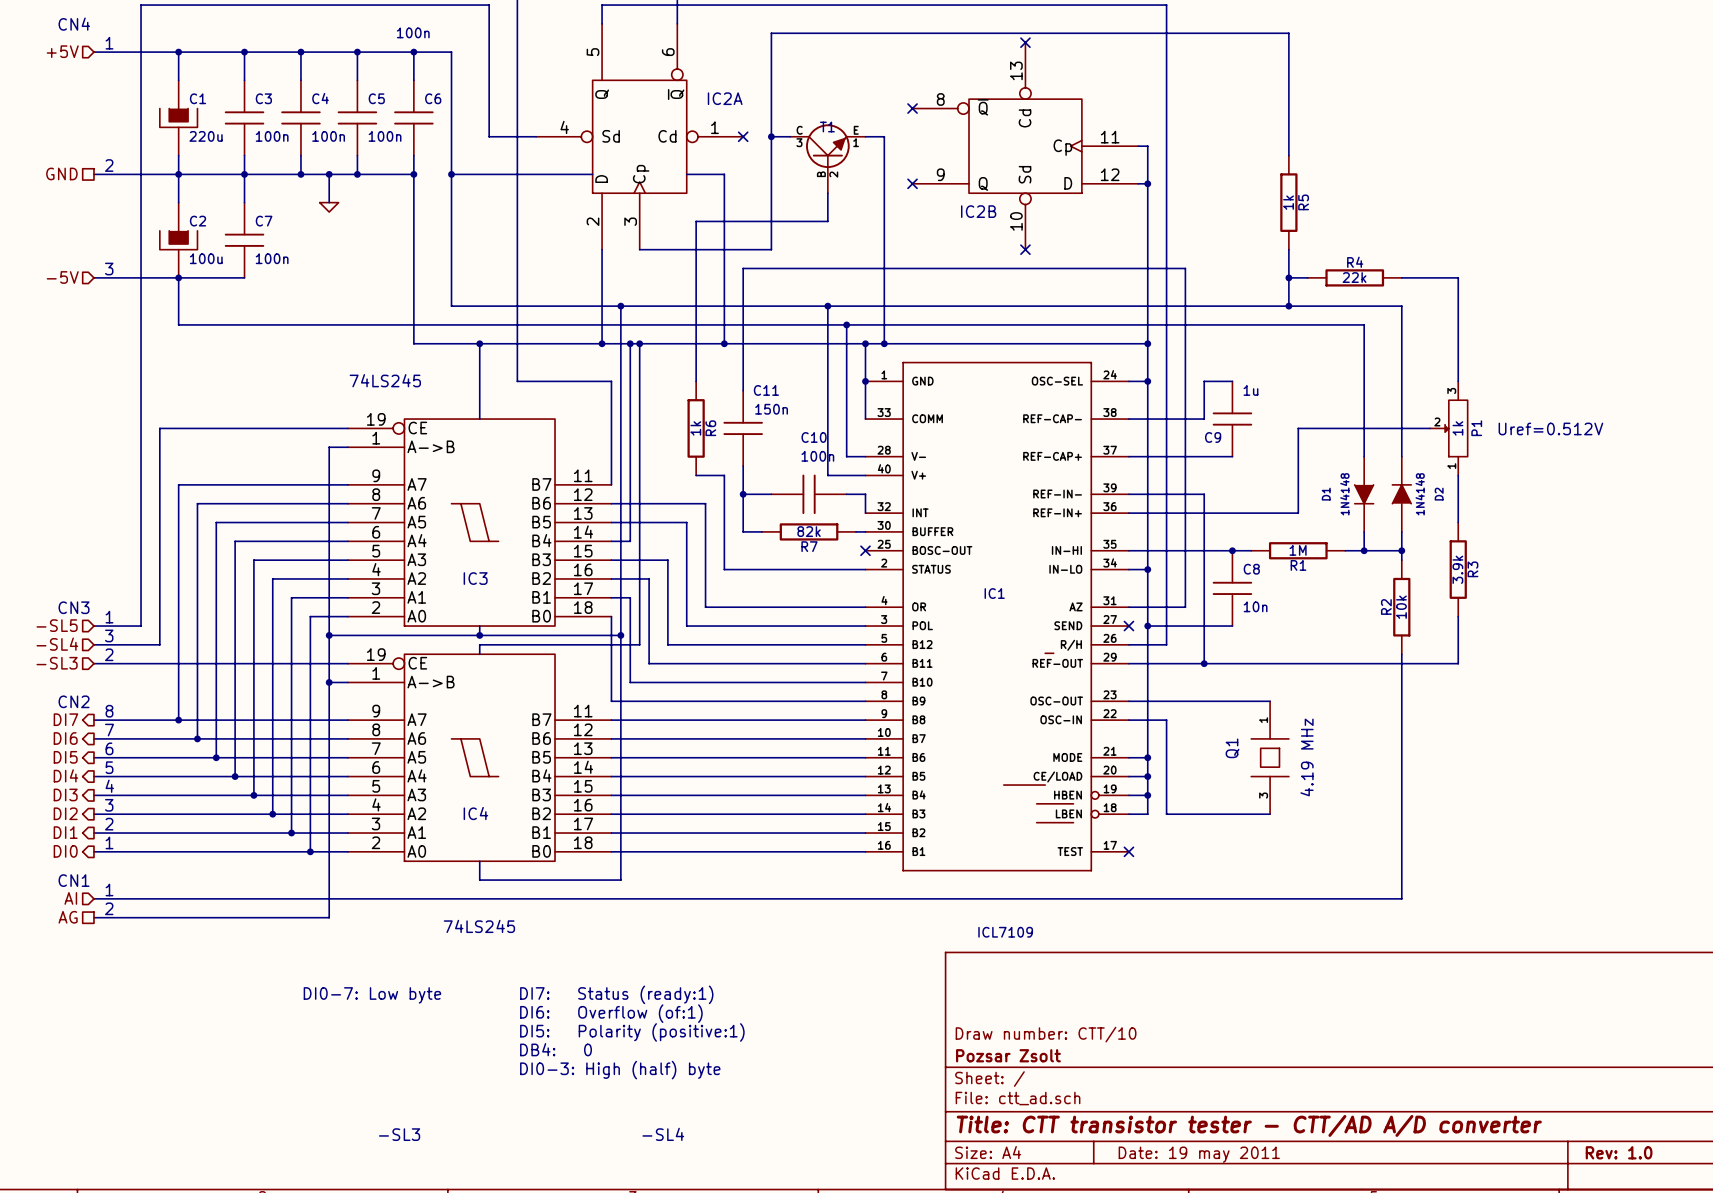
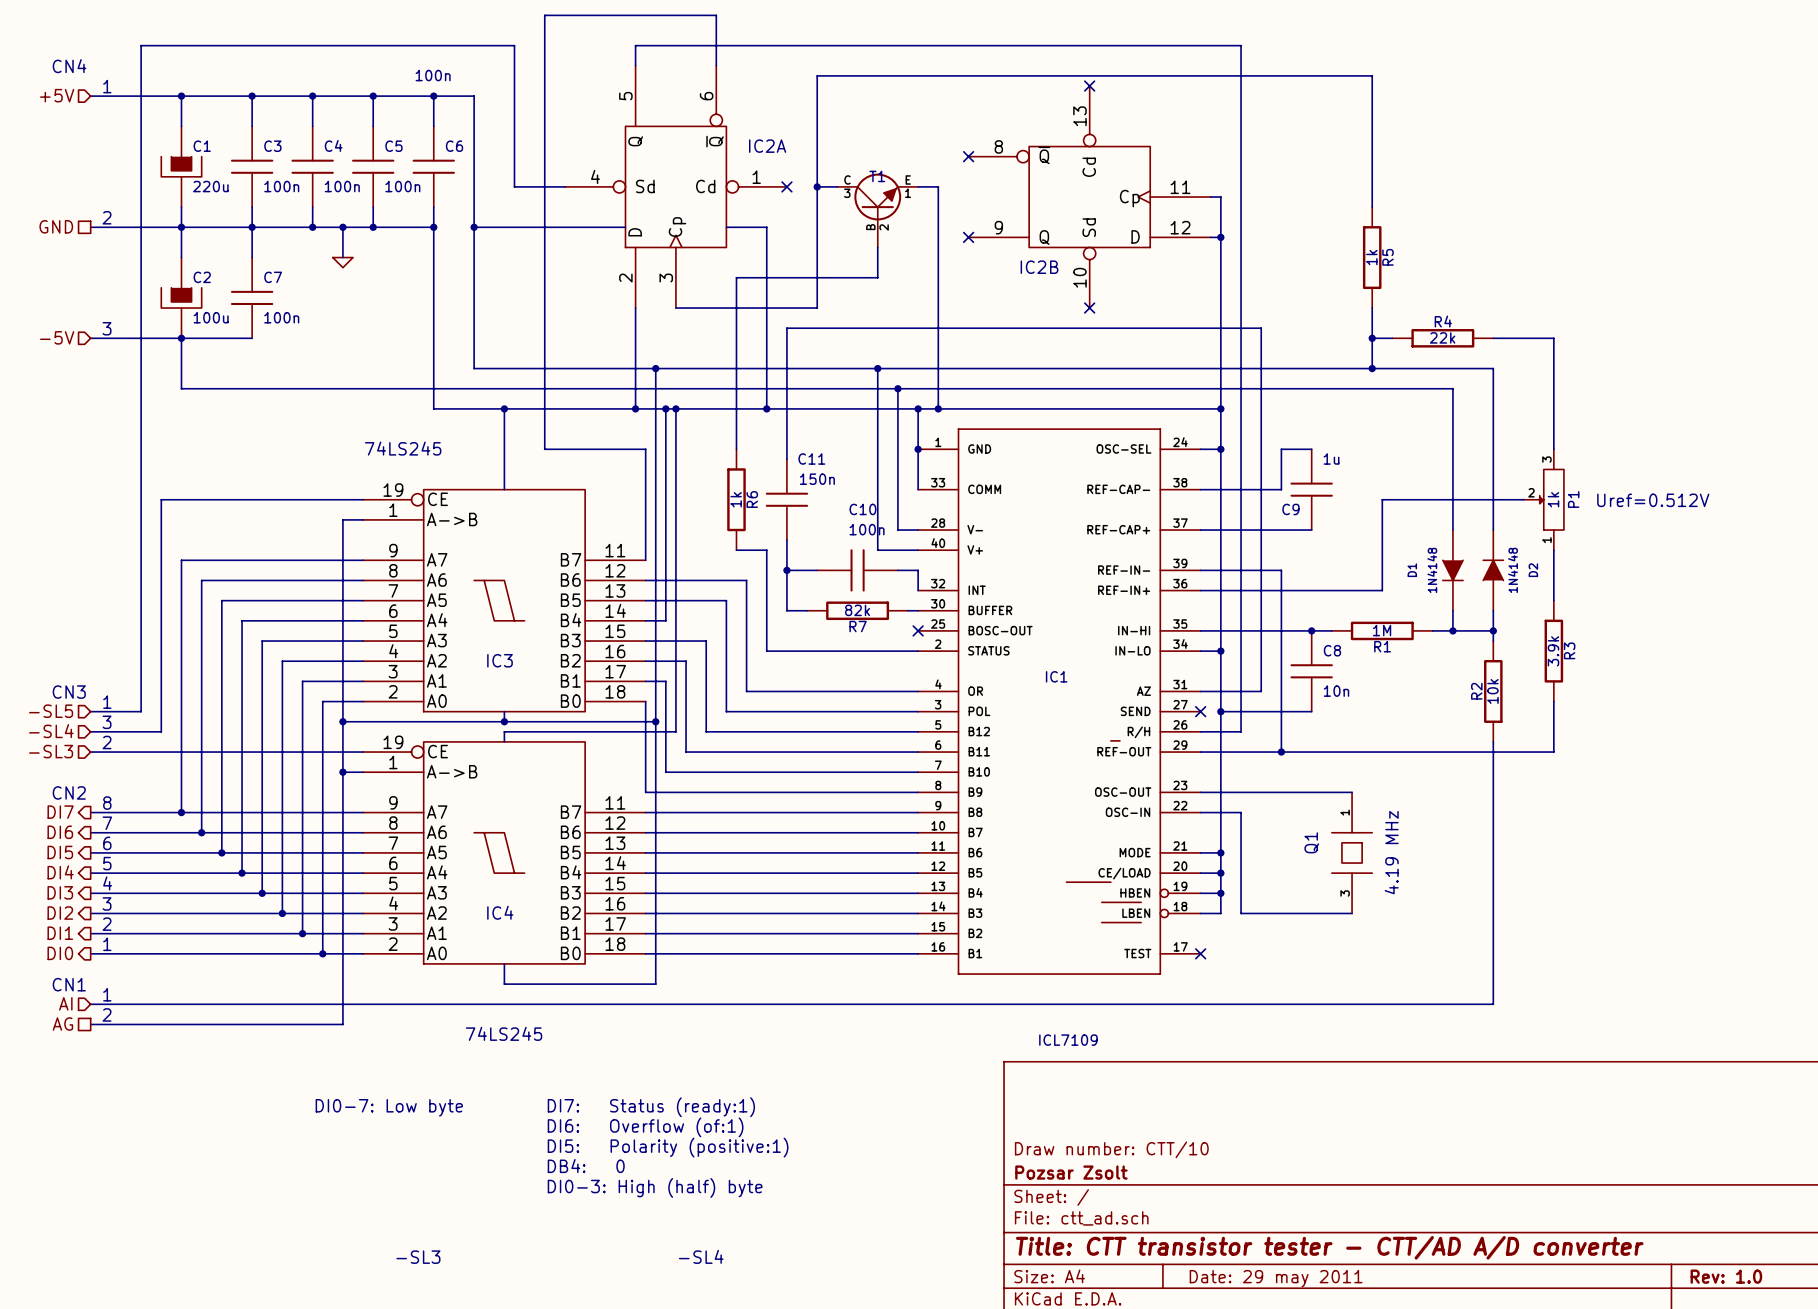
title block: Date: 19 may 2011 (1199, 1154) -> Date: 29 may 2011 (1276, 1278)

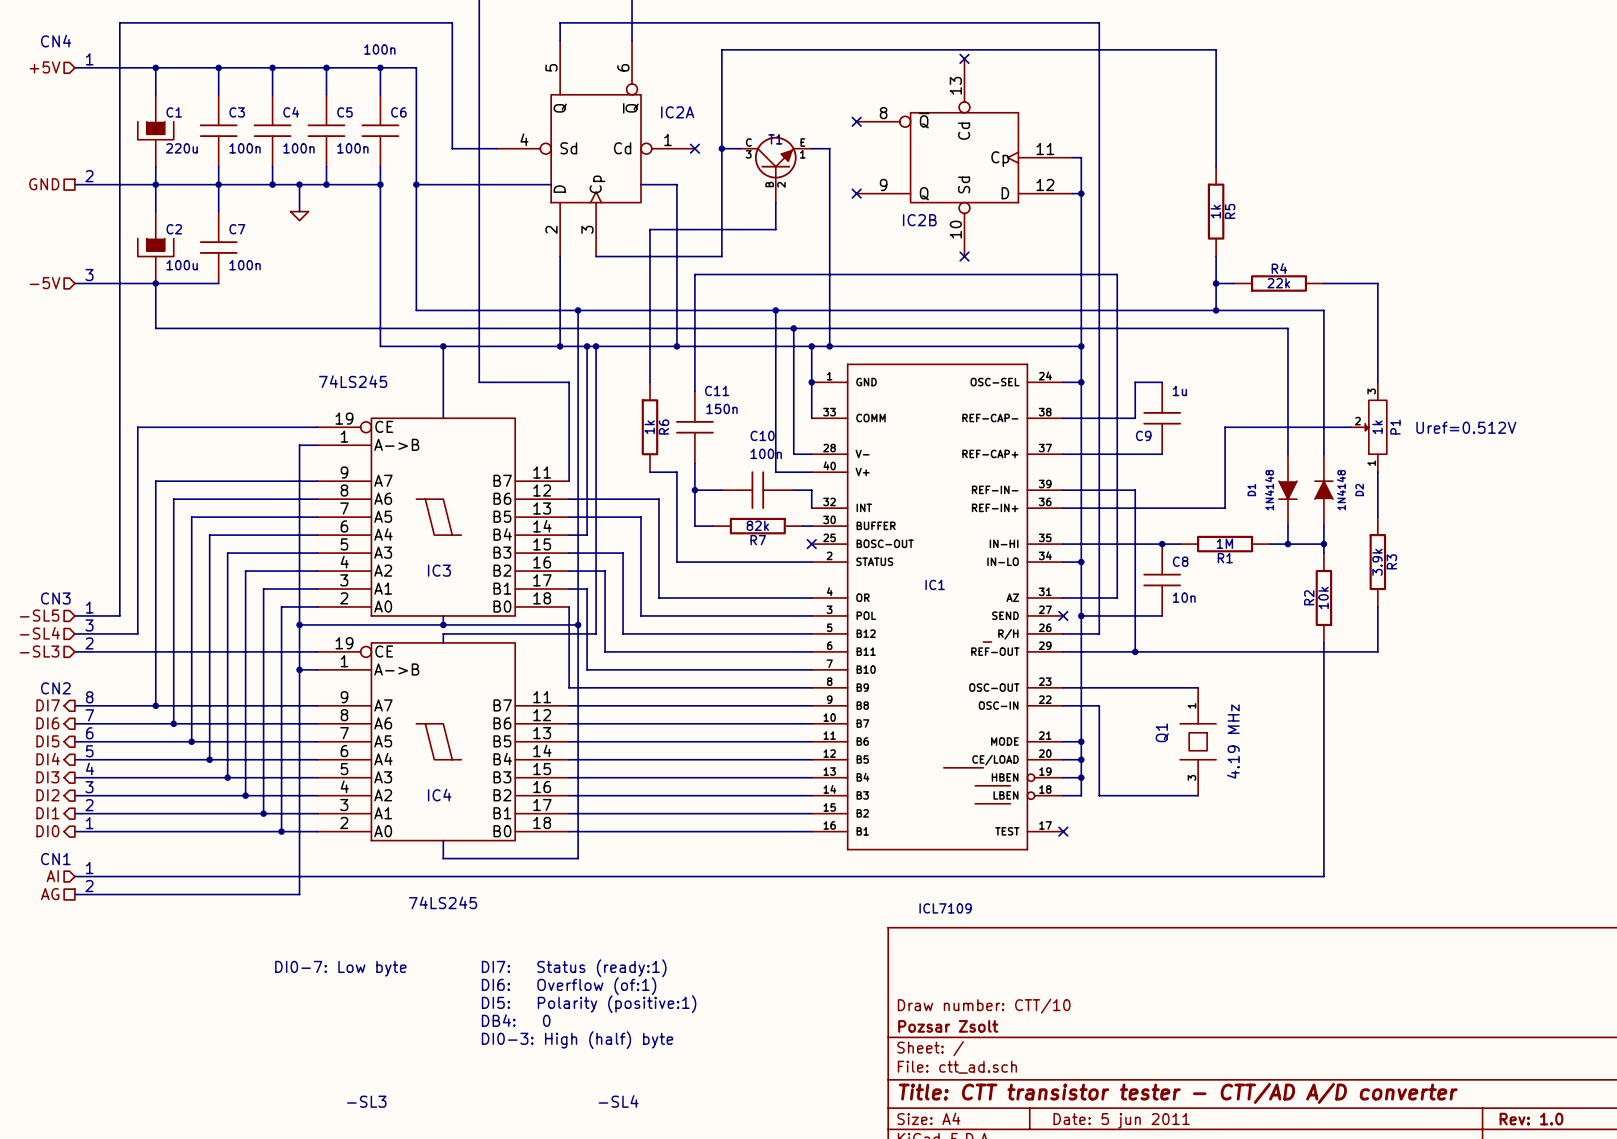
title block: Date: 29 may 2011 (1276, 1278) -> Date: 5 jun 2011 (1121, 1120)

